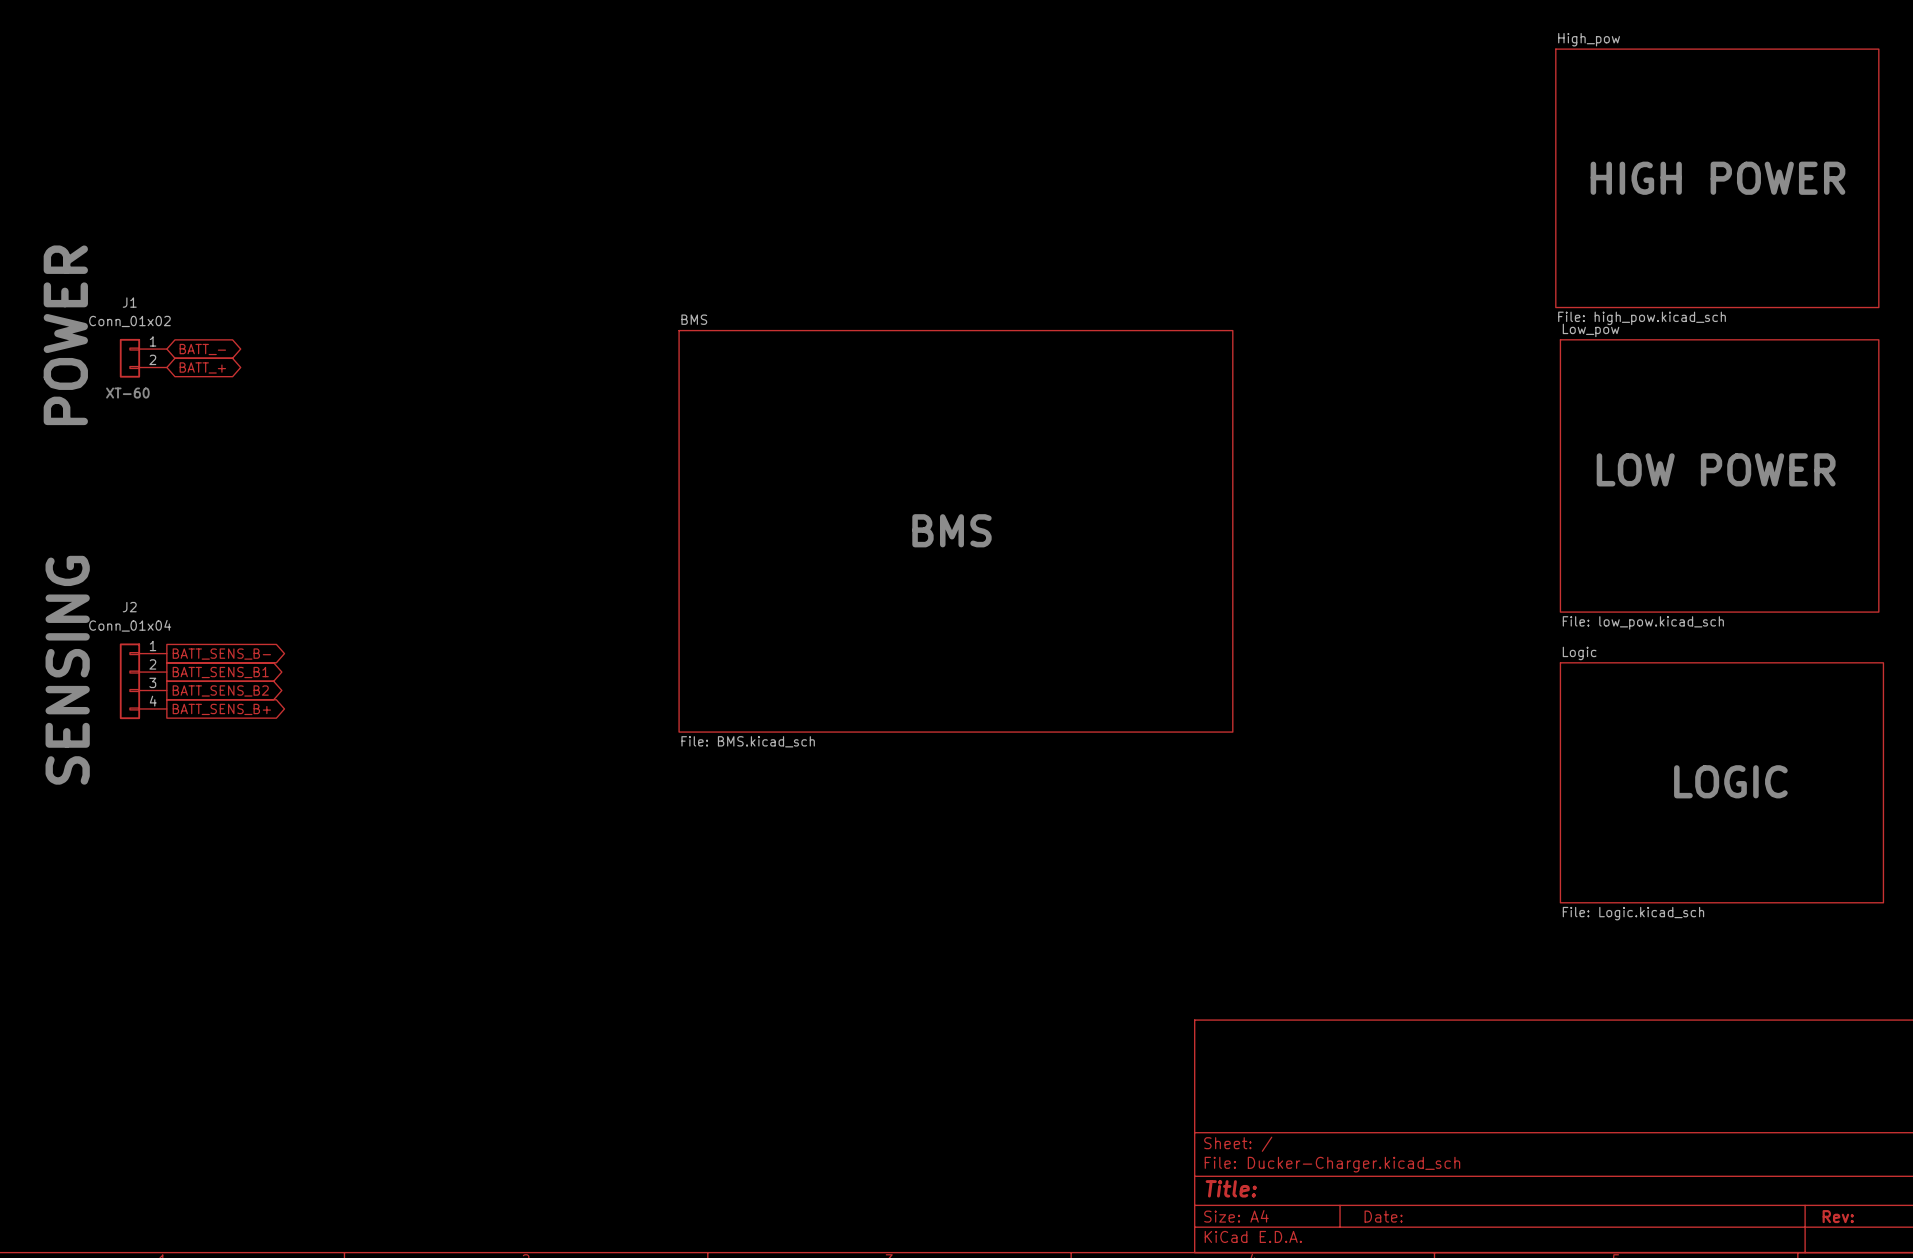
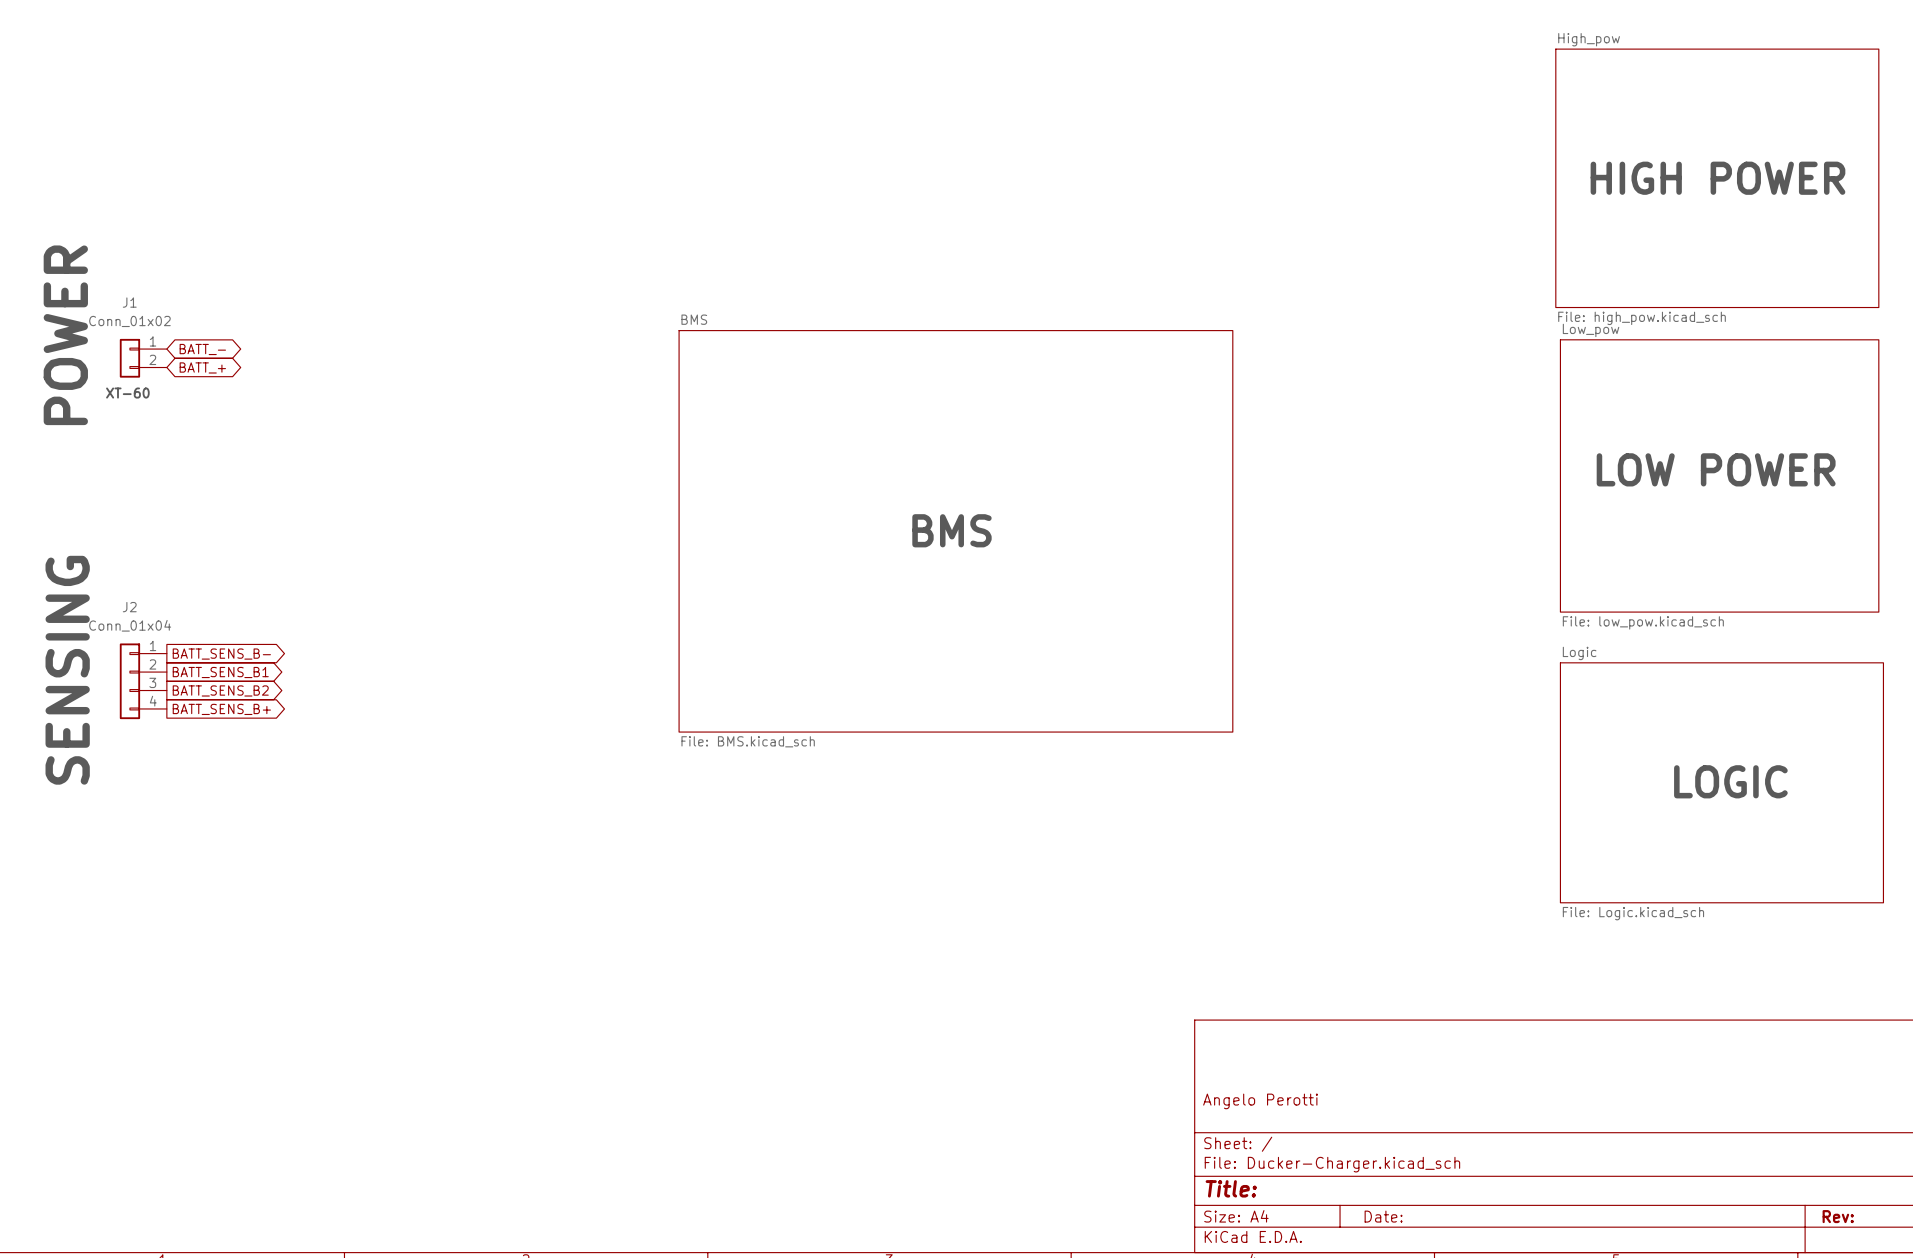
title block: none -> Angelo Perotti (1260, 1101)

